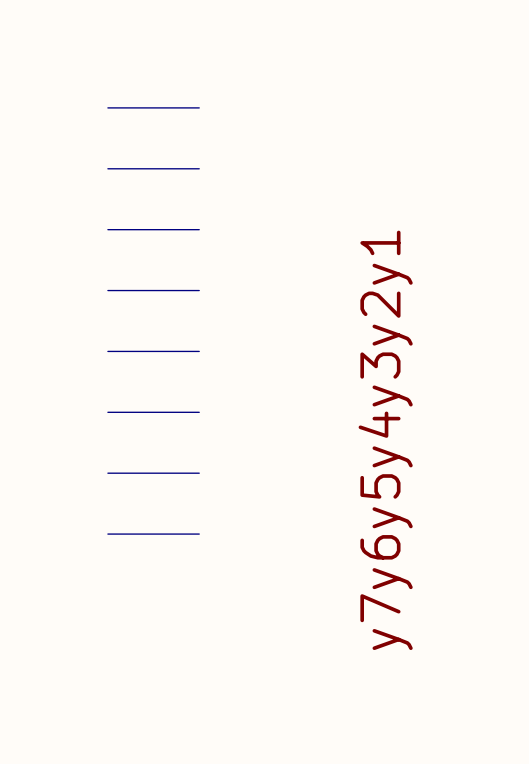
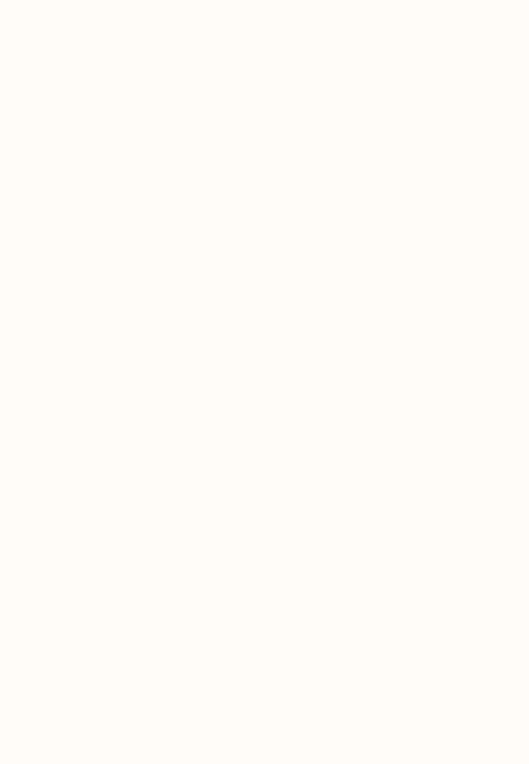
wire: (107, 107) (199, 107) -> none
wire: (107, 168) (199, 168) -> none
wire: (107, 229) (199, 229) -> none
label: y1 (386, 257) -> none
wire: (107, 290) (199, 290) -> none
label: y2 (386, 318) -> none
wire: (107, 351) (199, 351) -> none
label: y3 (386, 379) -> none
wire: (107, 412) (199, 412) -> none
label: y4 (385, 439) -> none
wire: (107, 473) (199, 473) -> none
label: y5 (386, 501) -> none
wire: (107, 534) (199, 534) -> none
label: y6 (386, 562) -> none
label: y7 (386, 622) -> none

